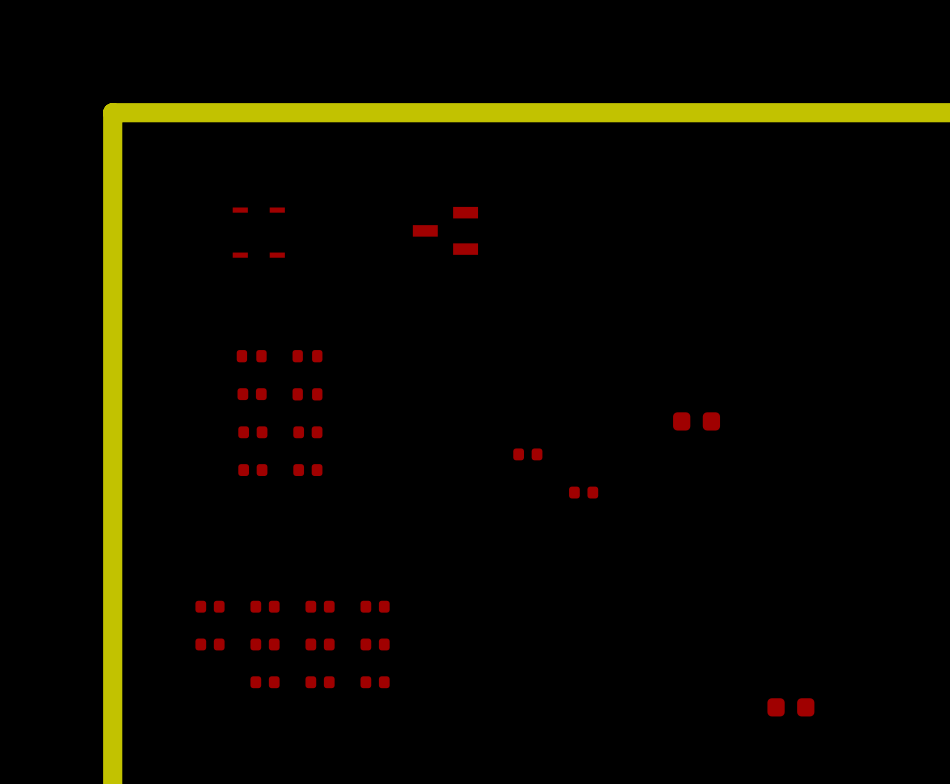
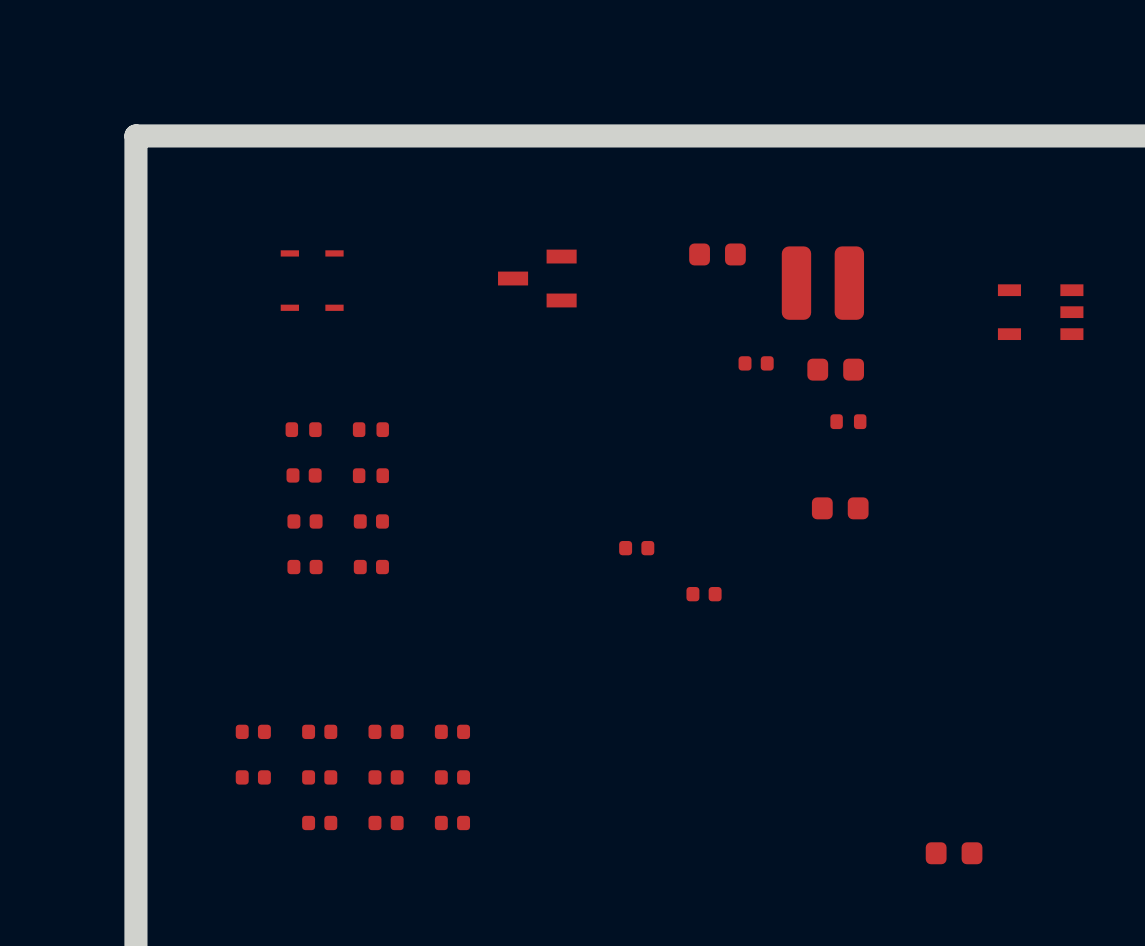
part: none -> (717, 254)
part: none -> (822, 283)
part: none -> (1040, 312)
part: none -> (756, 363)
part: none -> (835, 369)
part: none -> (848, 421)

